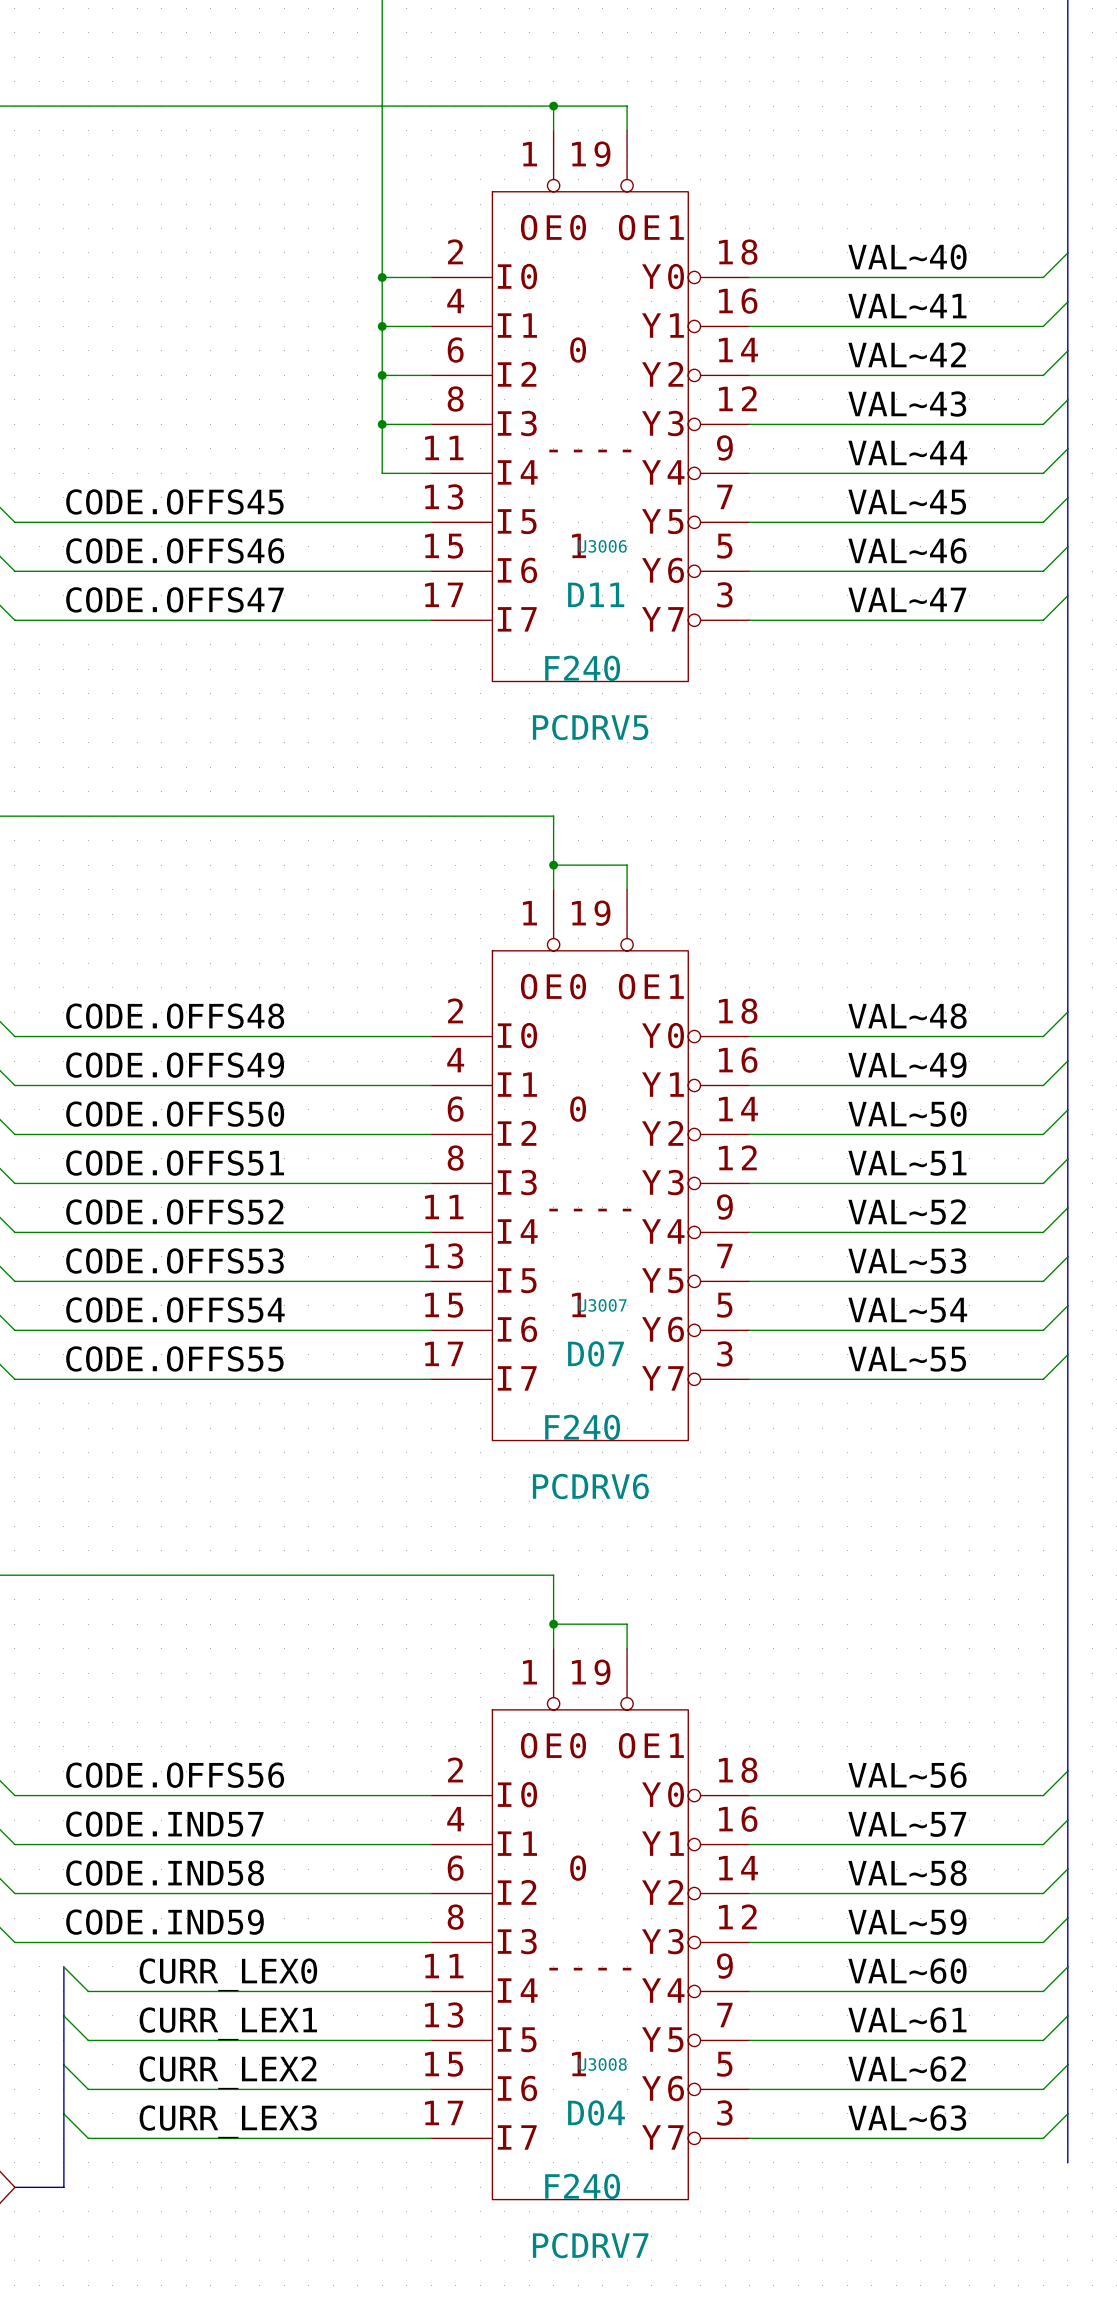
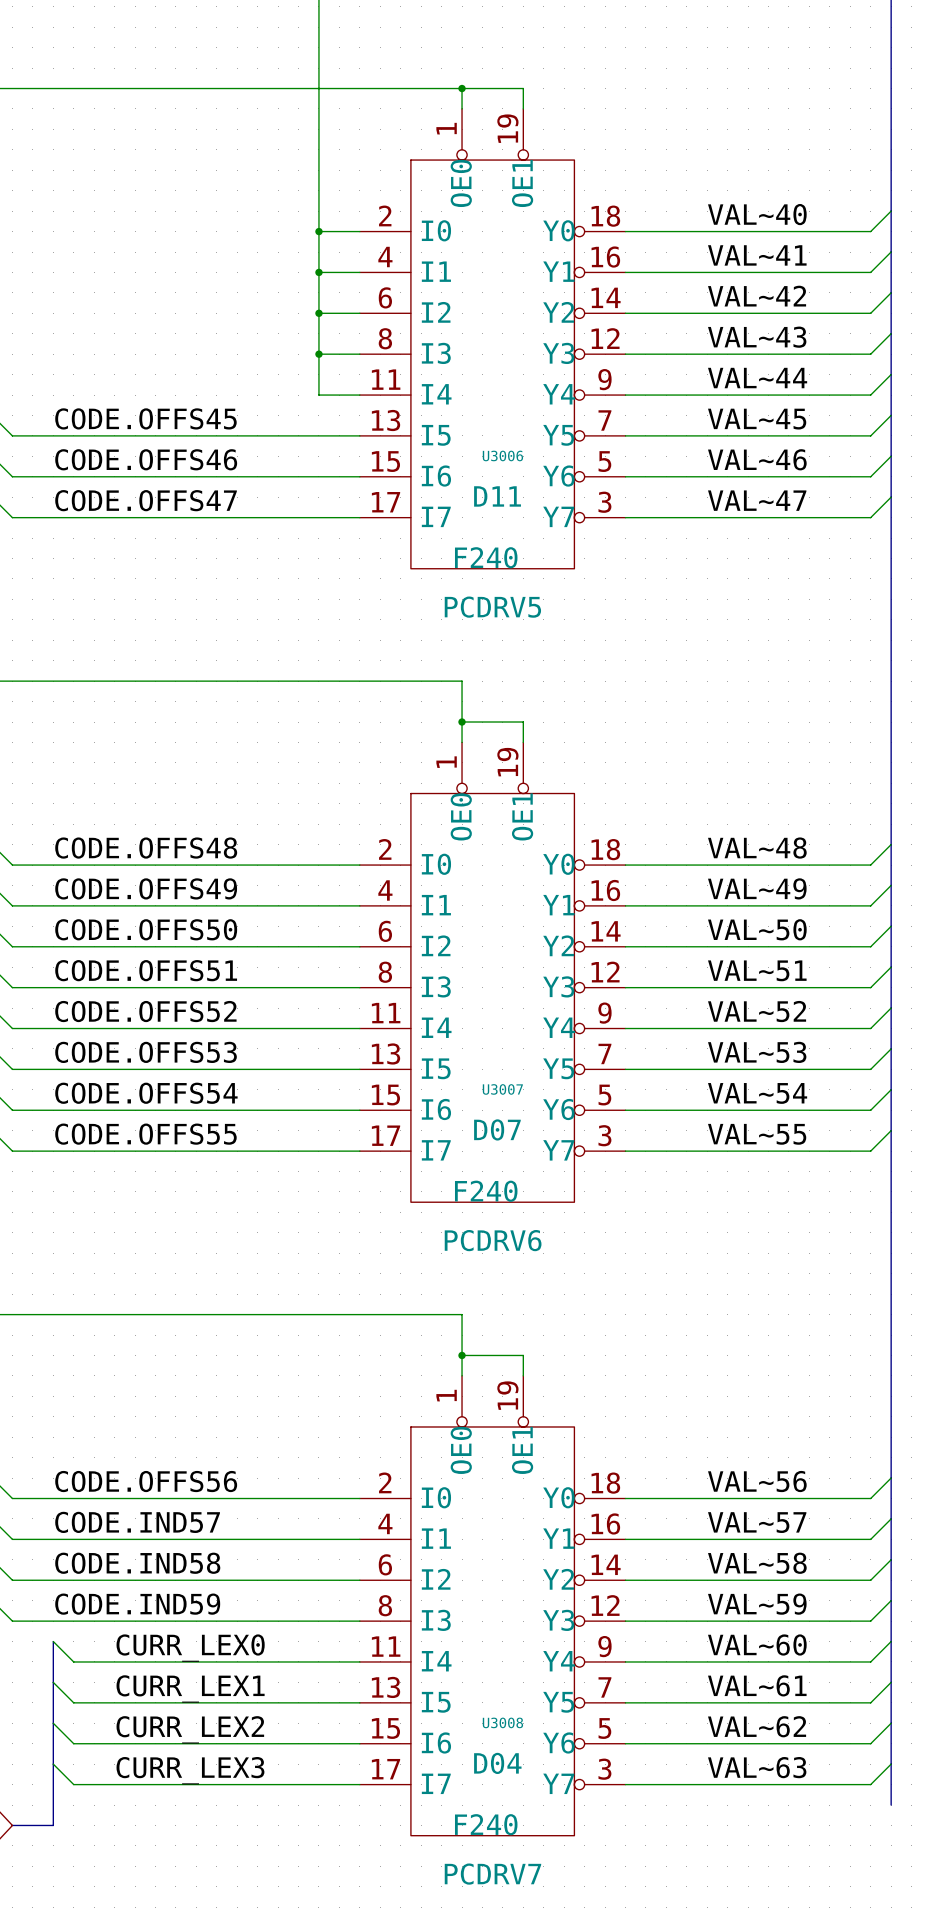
U3006 symbol: [431, 130, 750, 682] -> [359, 108, 626, 569]
U3007 symbol: [431, 889, 750, 1441] -> [359, 742, 626, 1203]
U3008 symbol: [431, 1648, 750, 2200] -> [359, 1375, 626, 1836]

